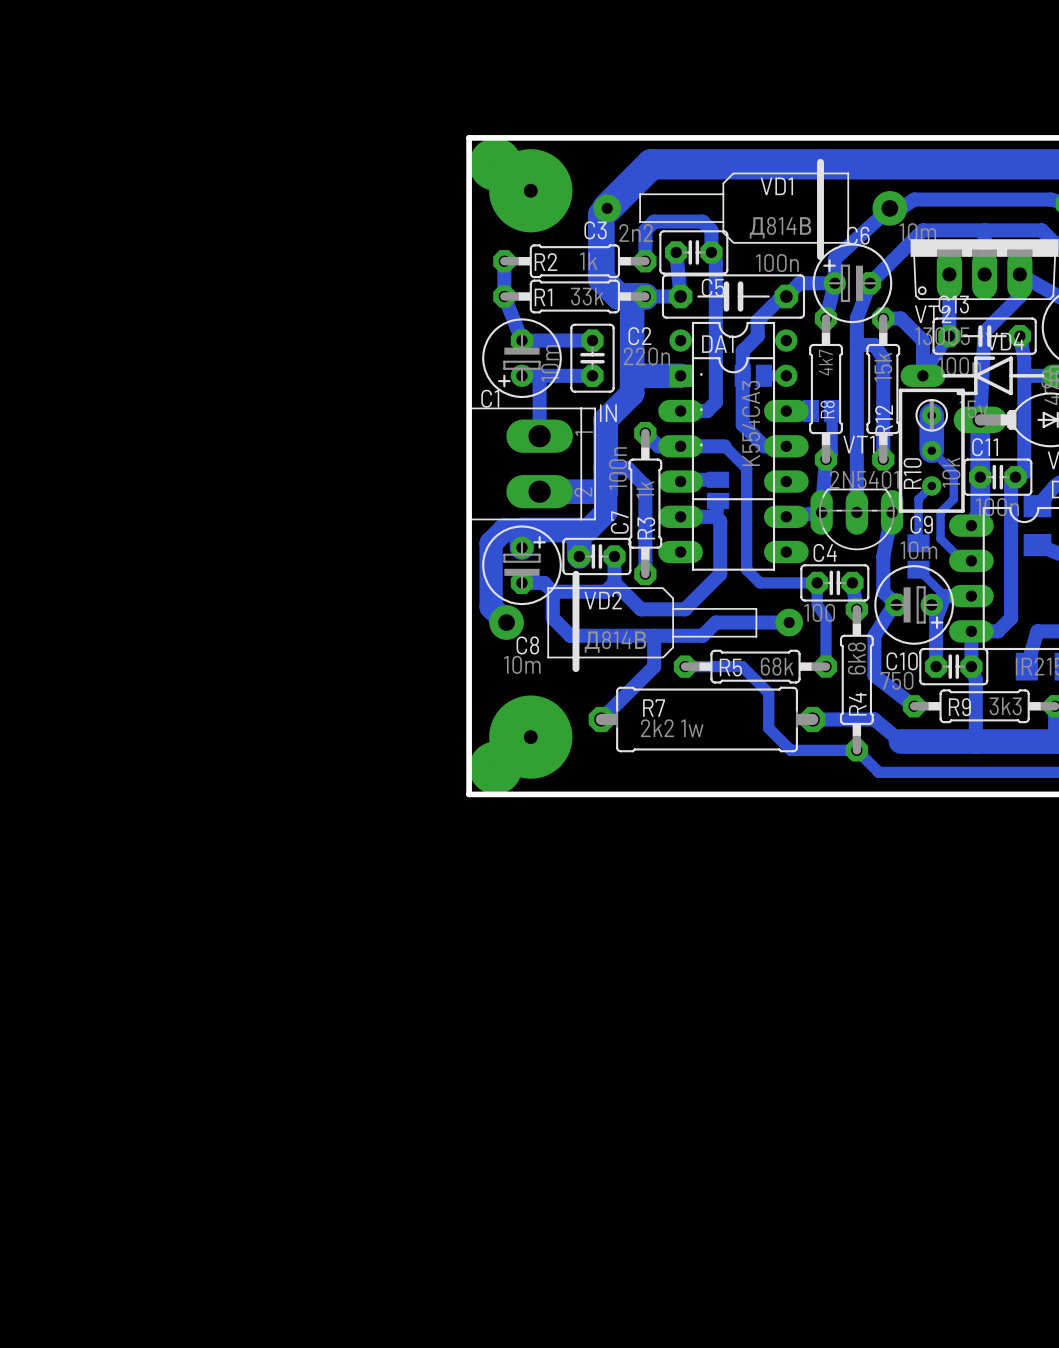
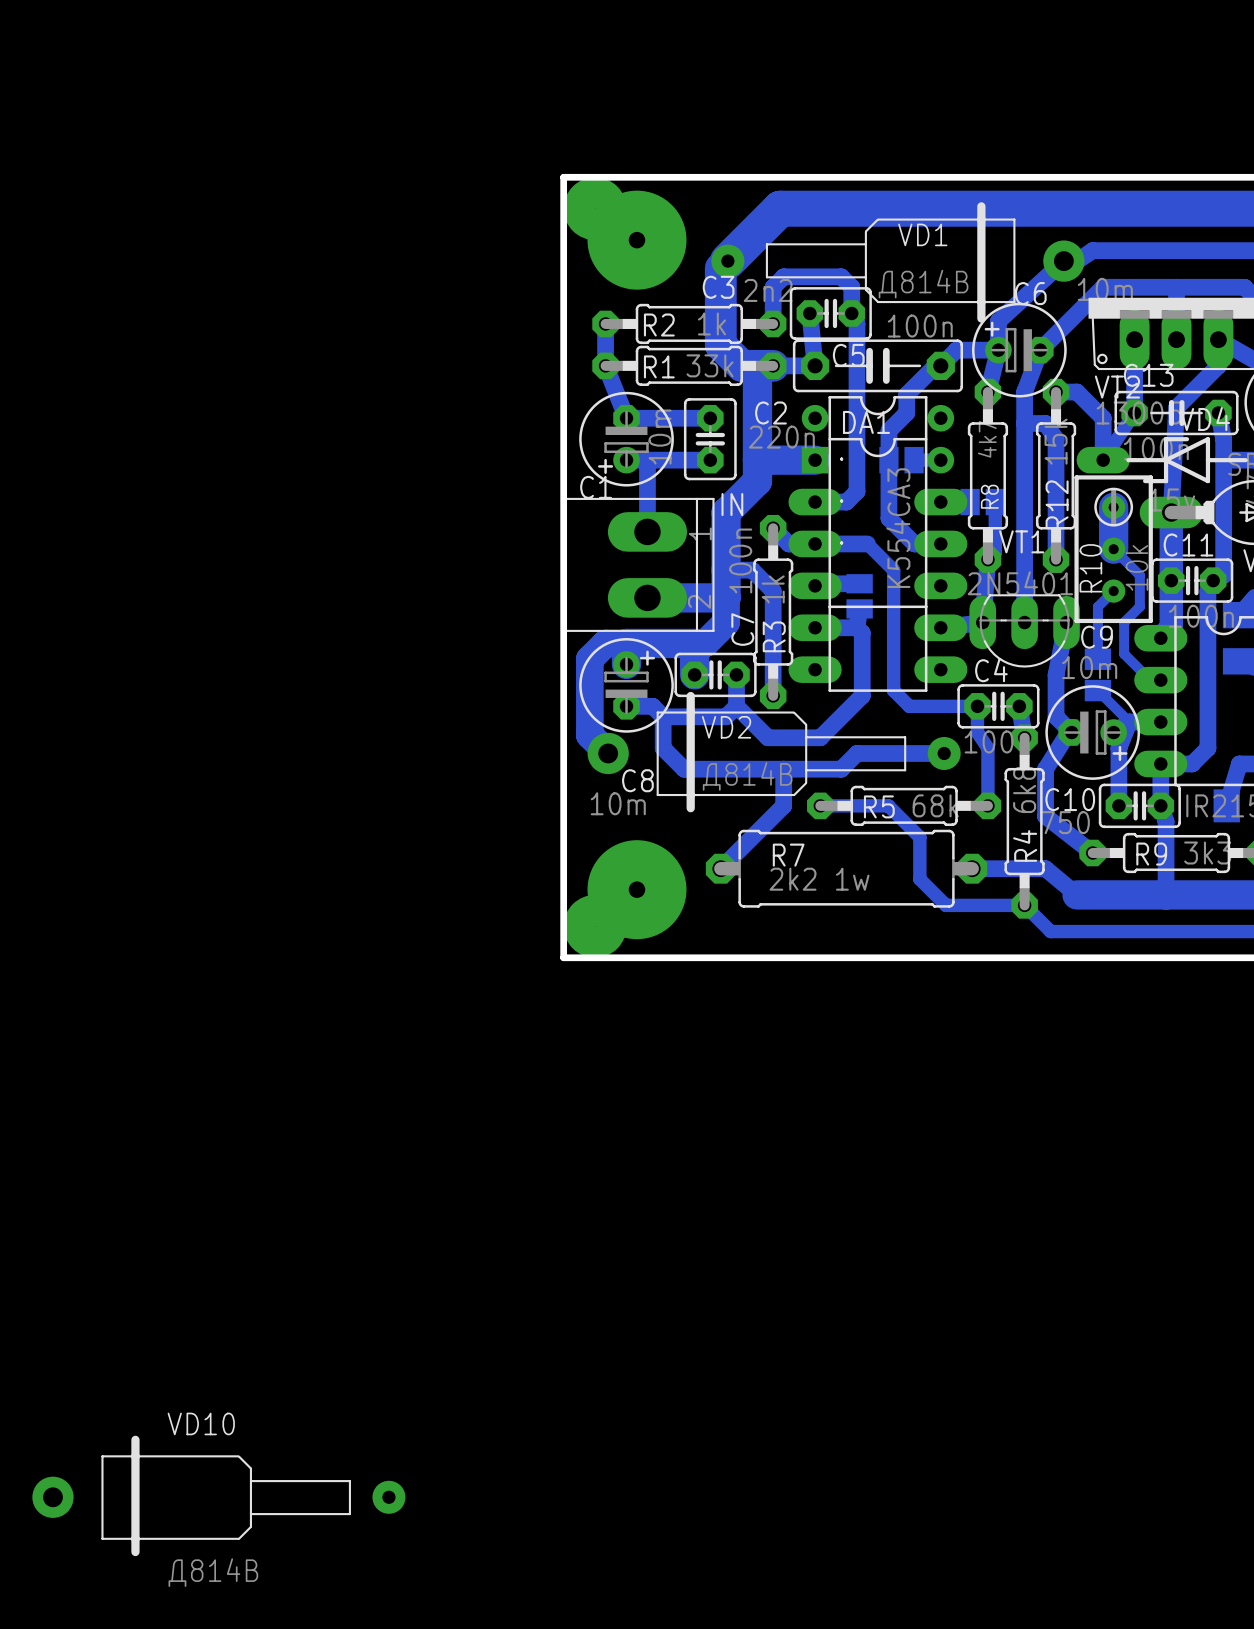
VD10: none -> Д814В (218, 1495)

